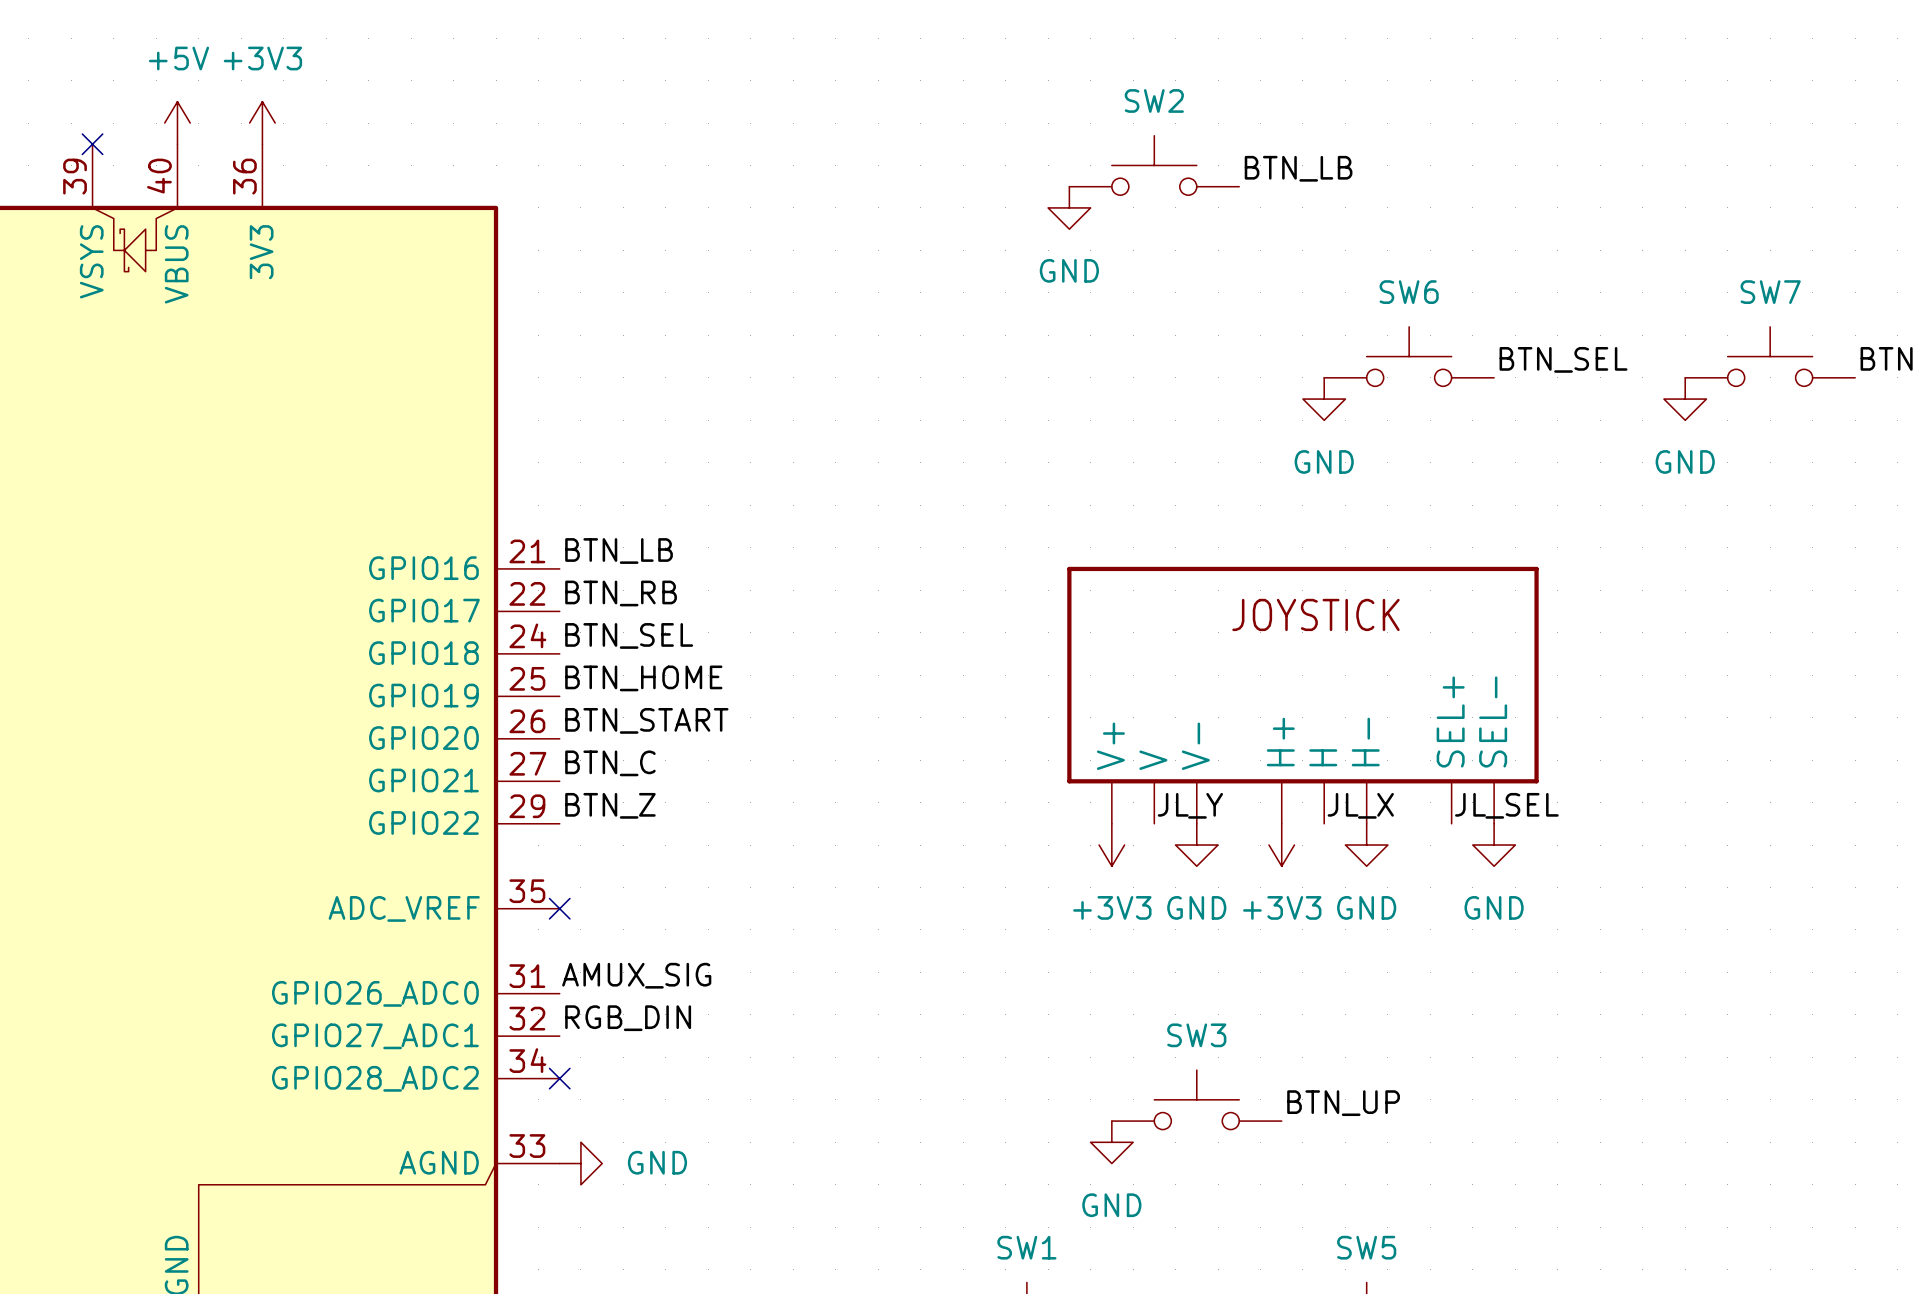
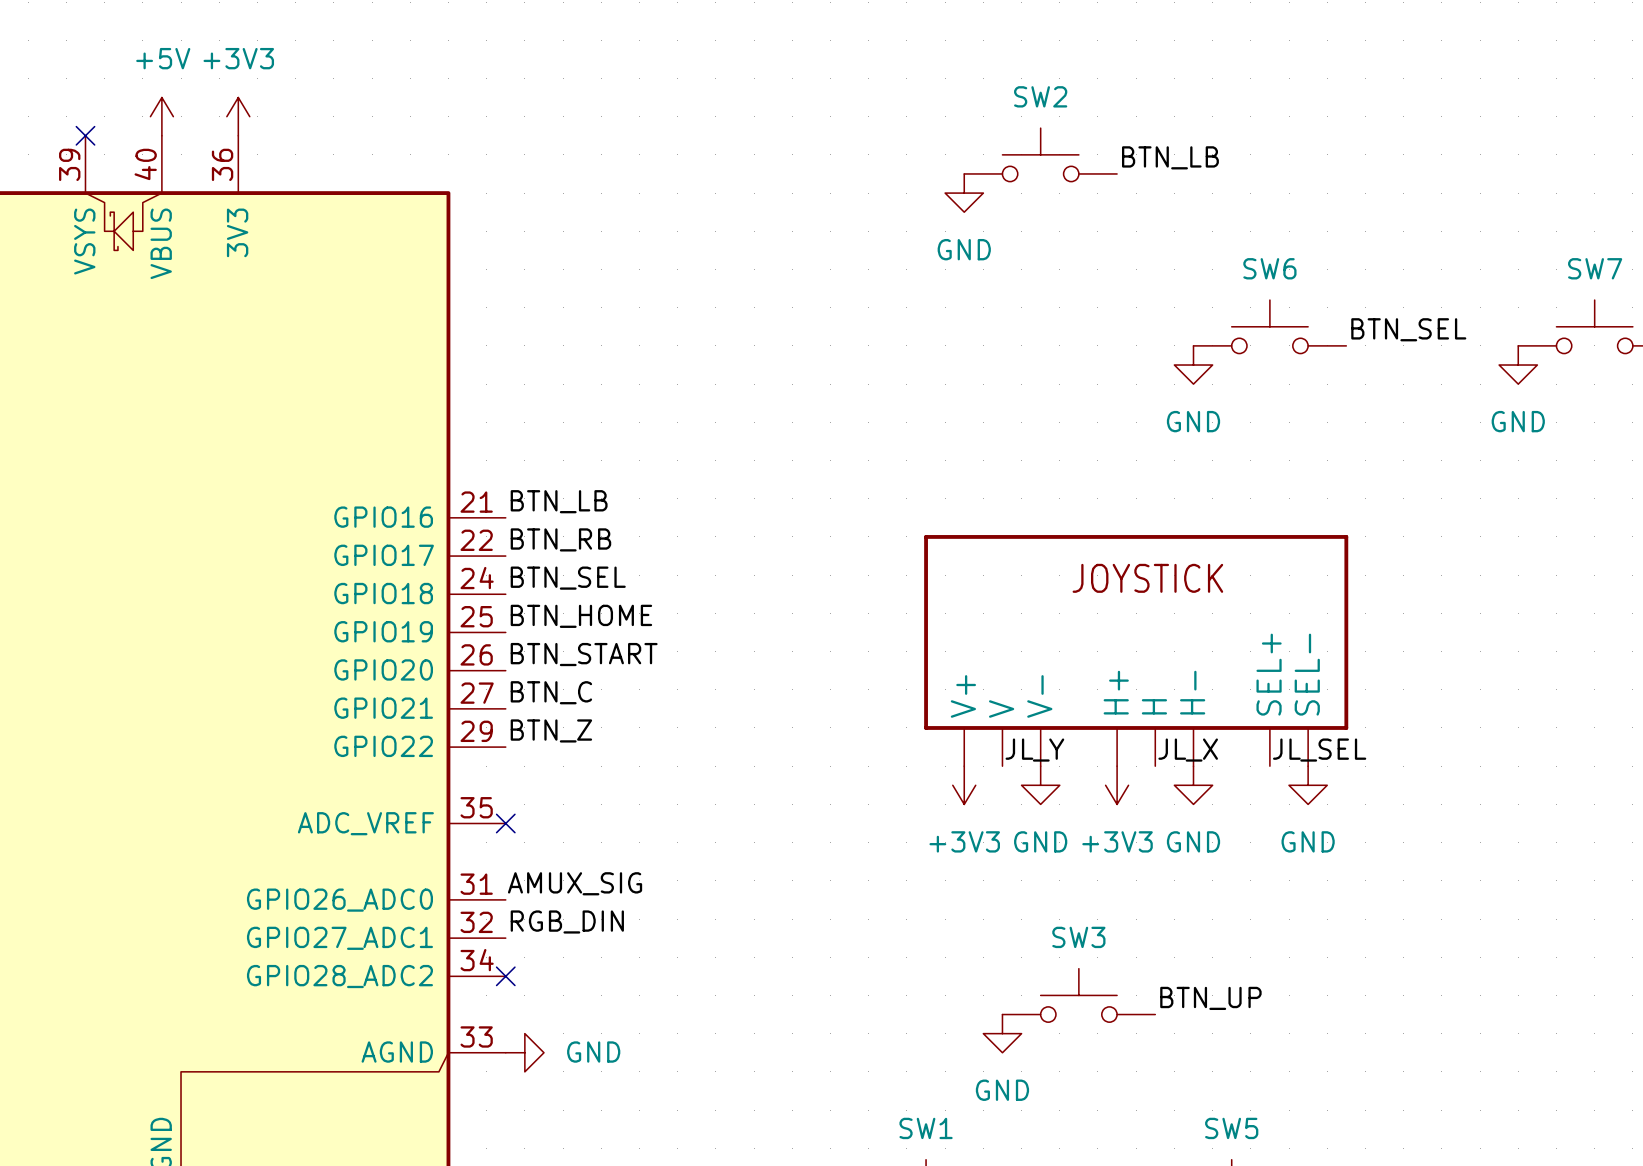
part position: (1302, 695) -> (1136, 650)
label position: JL_Y (1190, 805) -> JL_Y (1034, 750)
label position: JL_X (1360, 805) -> JL_X (1188, 750)
label position: JL_SEL (1506, 805) -> JL_SEL (1319, 750)
power symbol position: +3V3 (1111, 845) -> +3V3 (964, 785)
power symbol position: GND (1196, 845) -> GND (1040, 785)
power symbol position: +3V3 (1281, 845) -> +3V3 (1117, 785)
power symbol: GND (1366, 845) -> none
power symbol: GND (1494, 845) -> none
power symbol: none -> GND (1193, 785)
power symbol: none -> GND (1308, 785)

